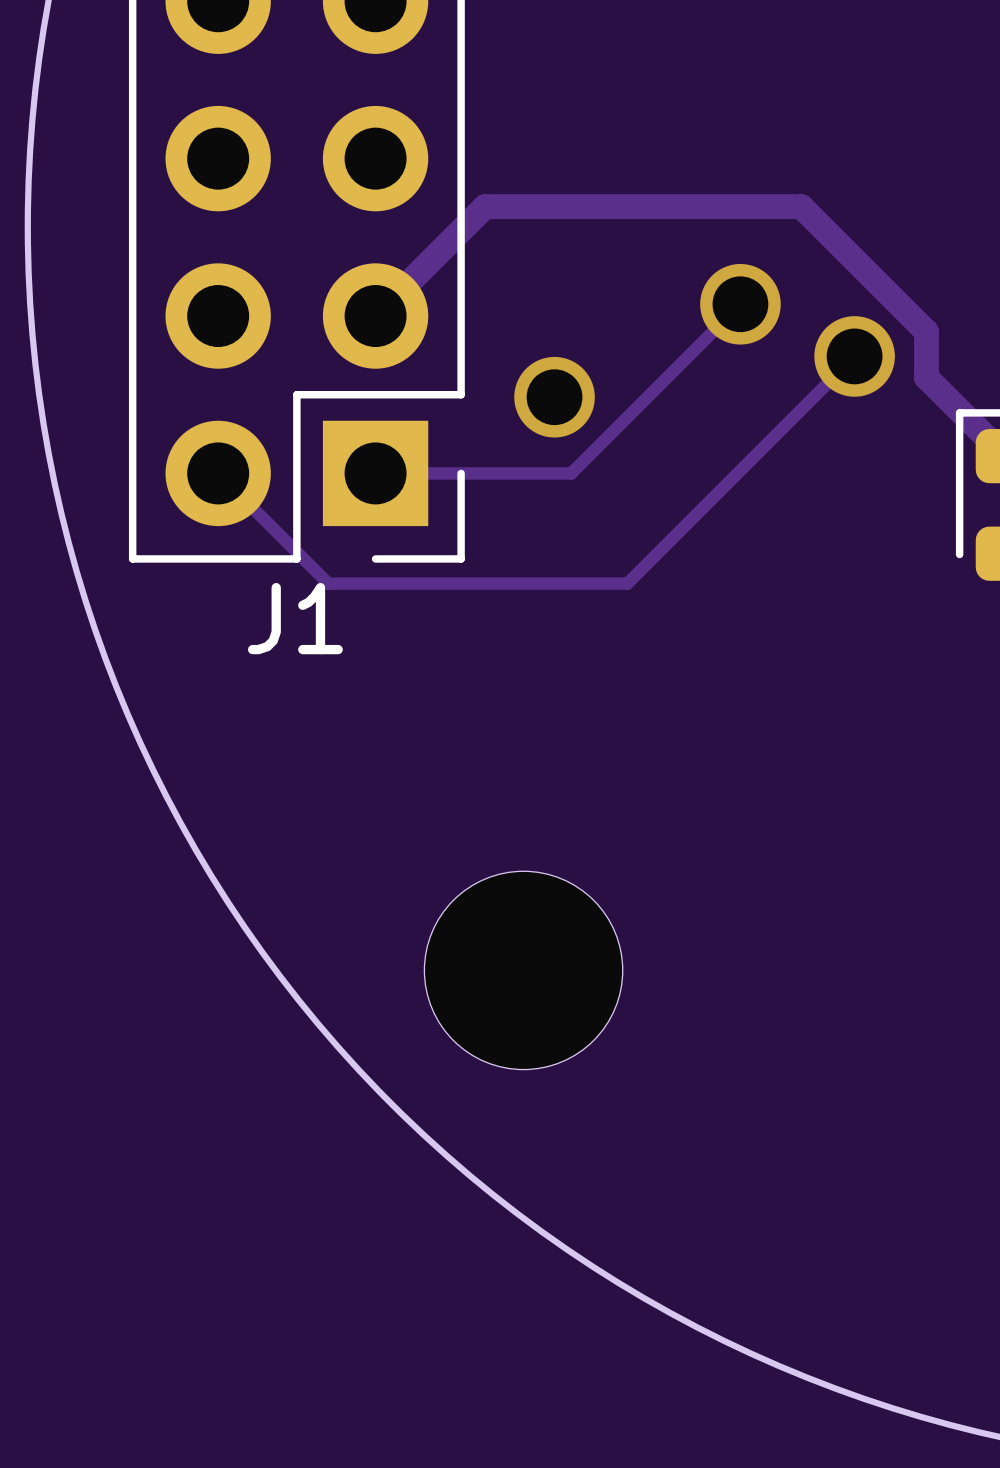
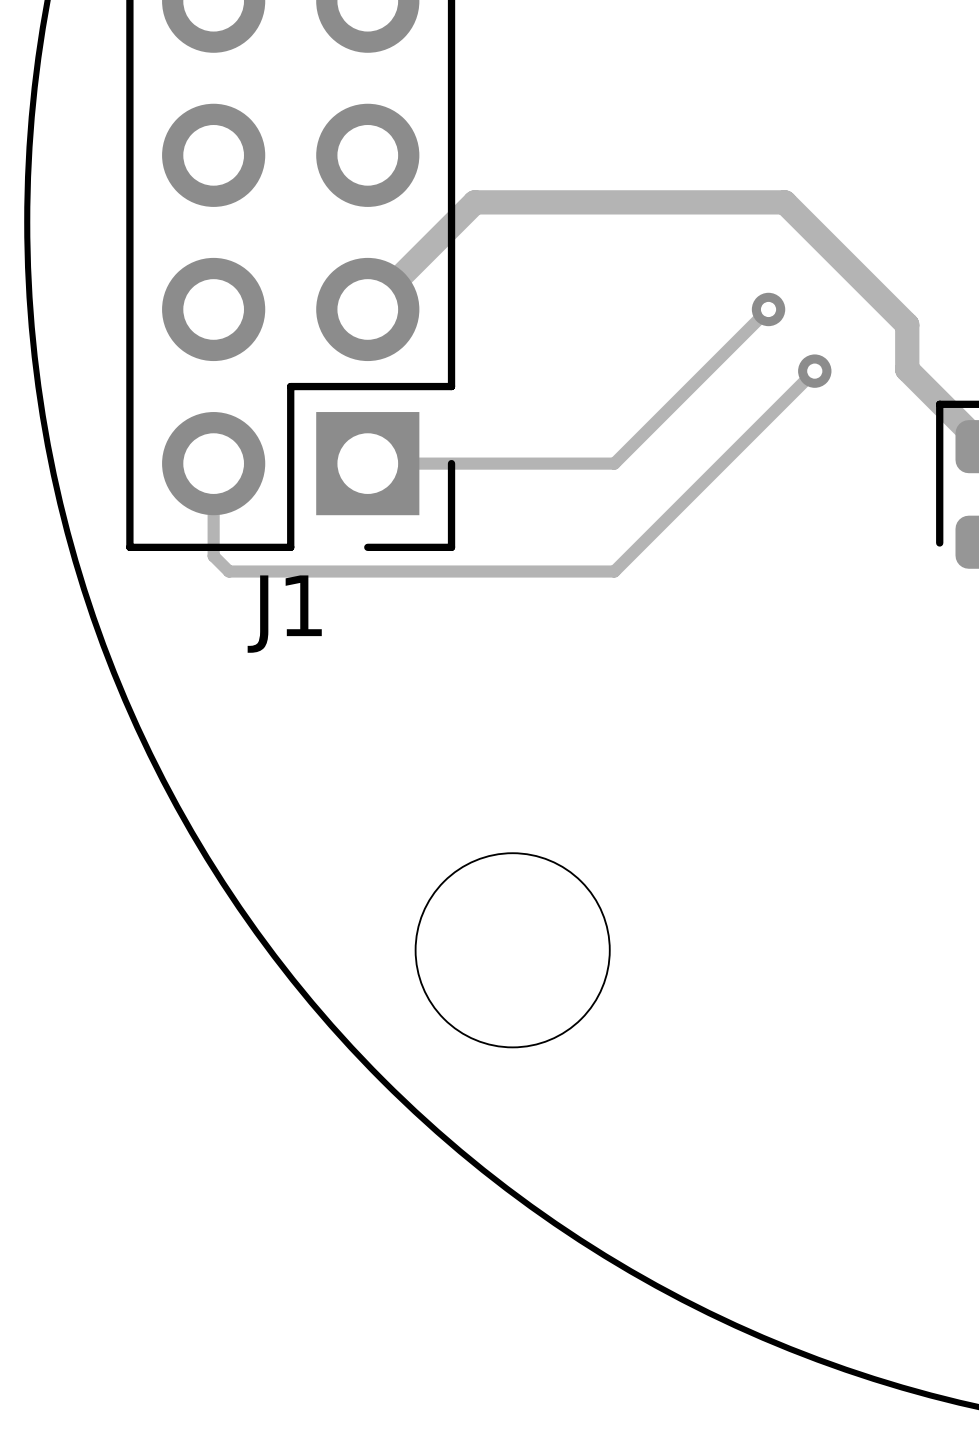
via size: [700, 263, 781, 345] -> [751, 292, 786, 327]
track: (740, 304) (571, 473) -> (768, 309) (614, 463) (559, 463)
via size: [814, 316, 895, 397] -> [798, 354, 832, 388]
via: (554, 397) -> none
track: (218, 473) (328, 583) -> (213, 463) (213, 556) (229, 571) (321, 571)

